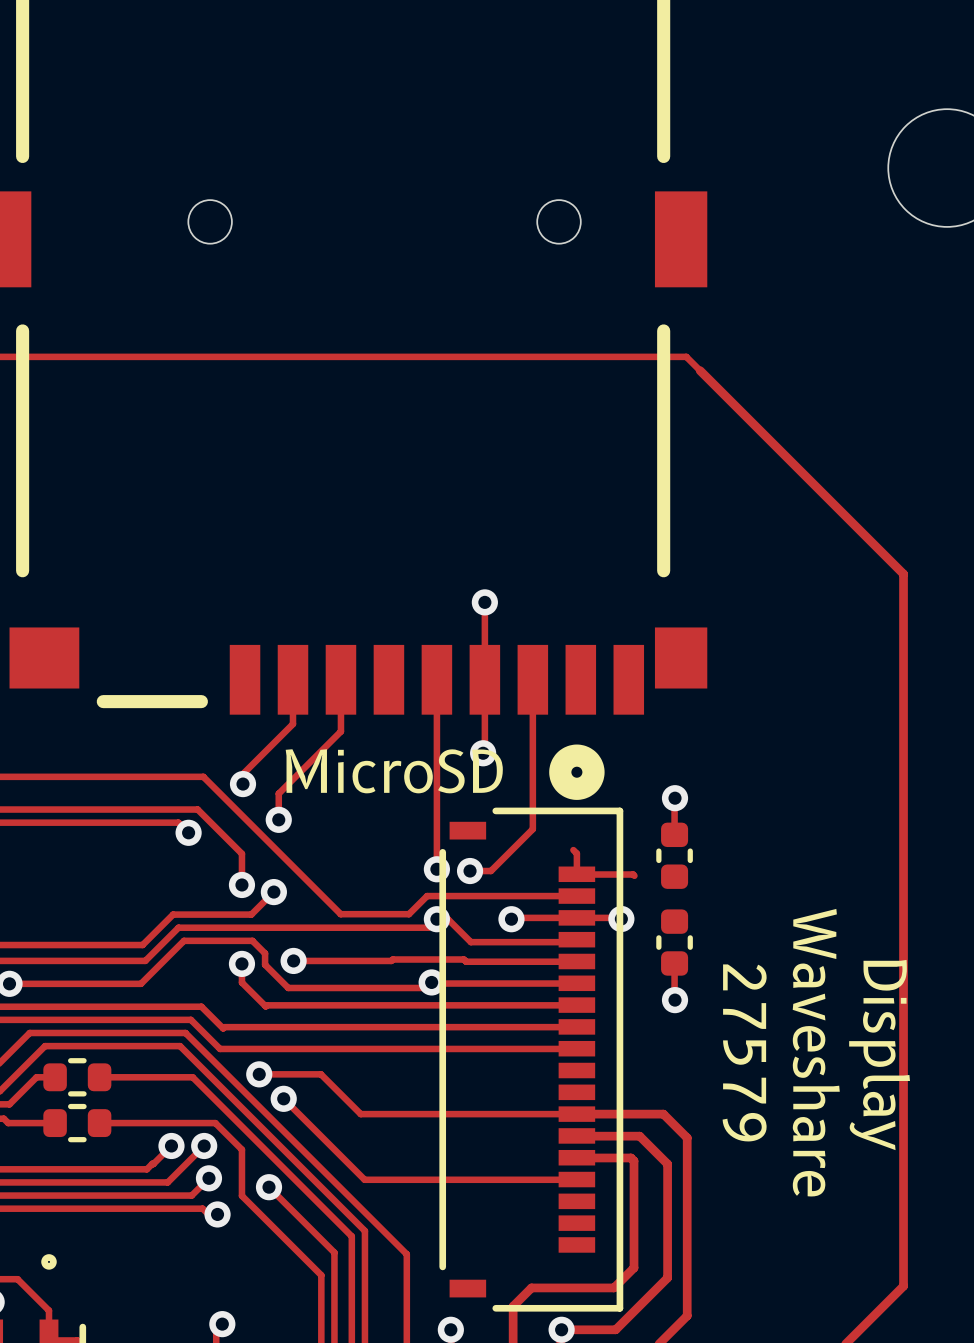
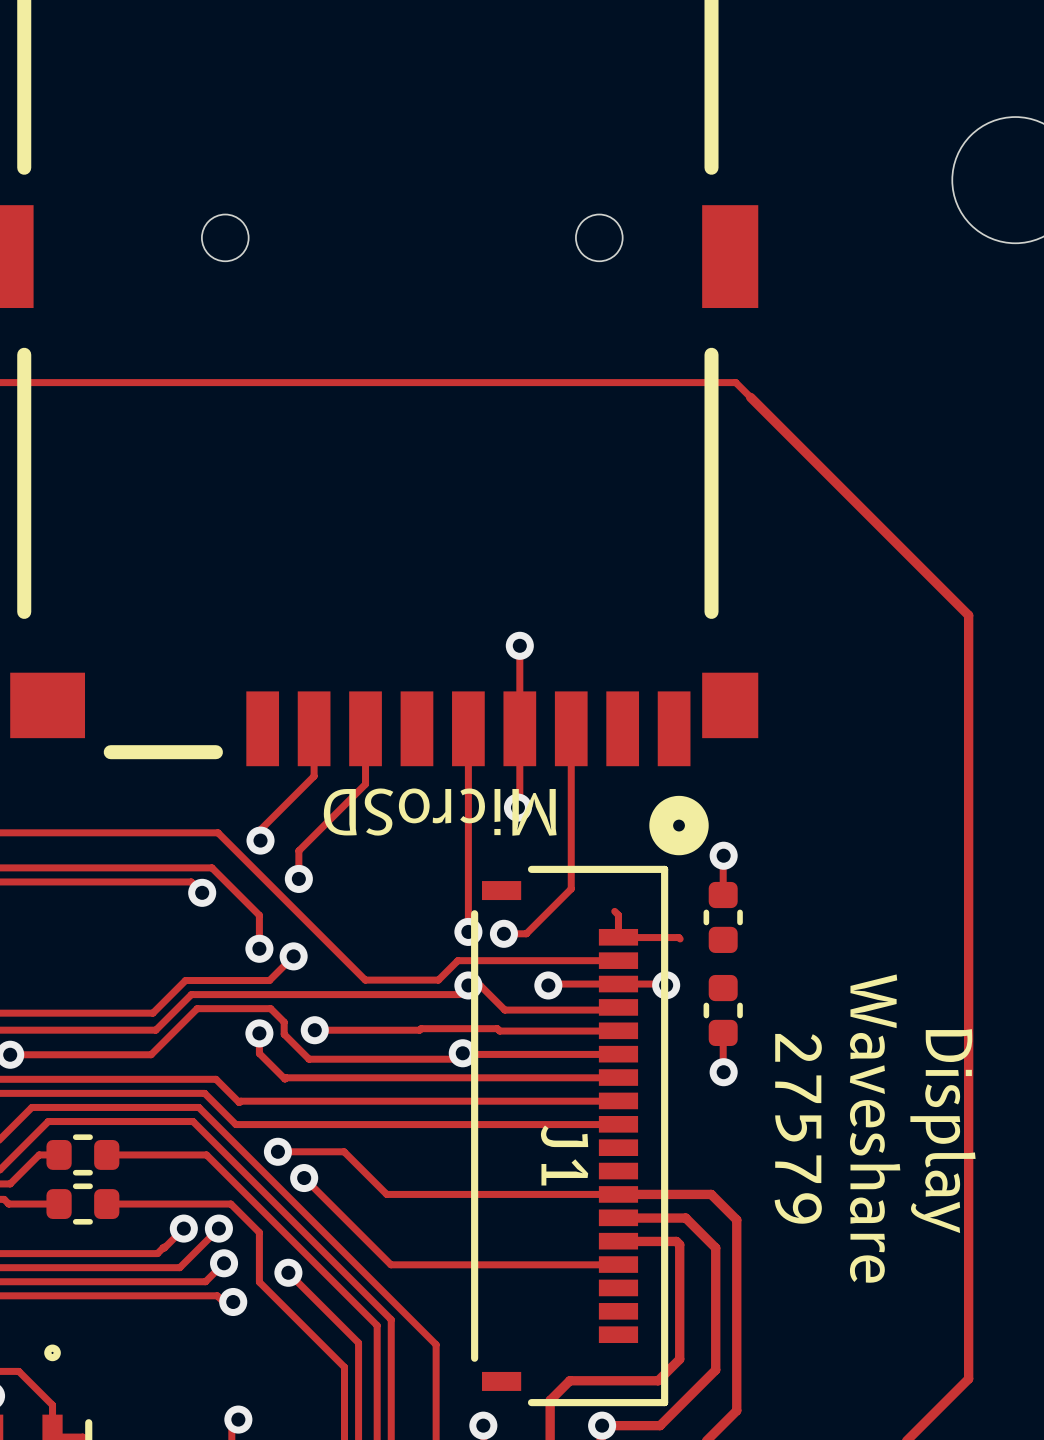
text rotation: 0° (394, 771) -> 180° (440, 812)
J1: none -> (589, 1101)
part: (531, 1028) -> none

